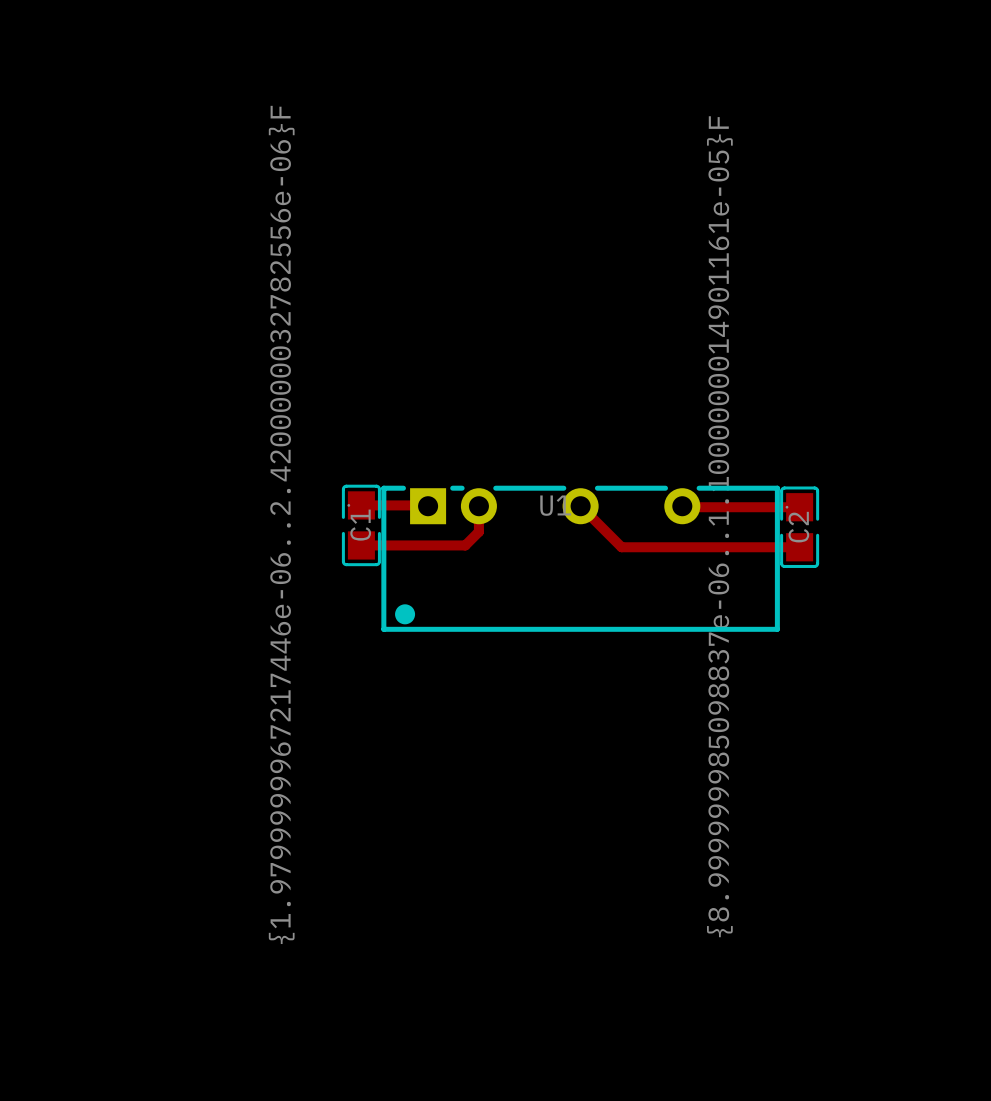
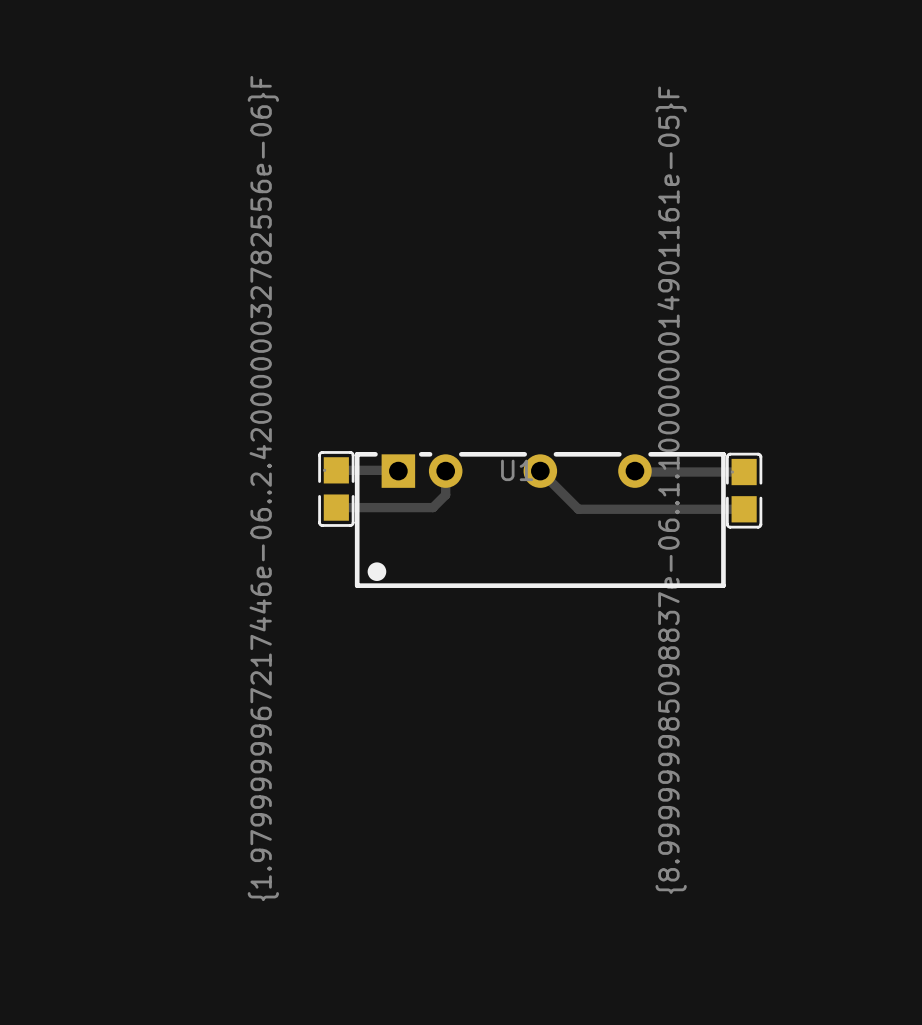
C1 name: C1 (360, 525) -> none
C2 name: C2 (798, 527) -> none

